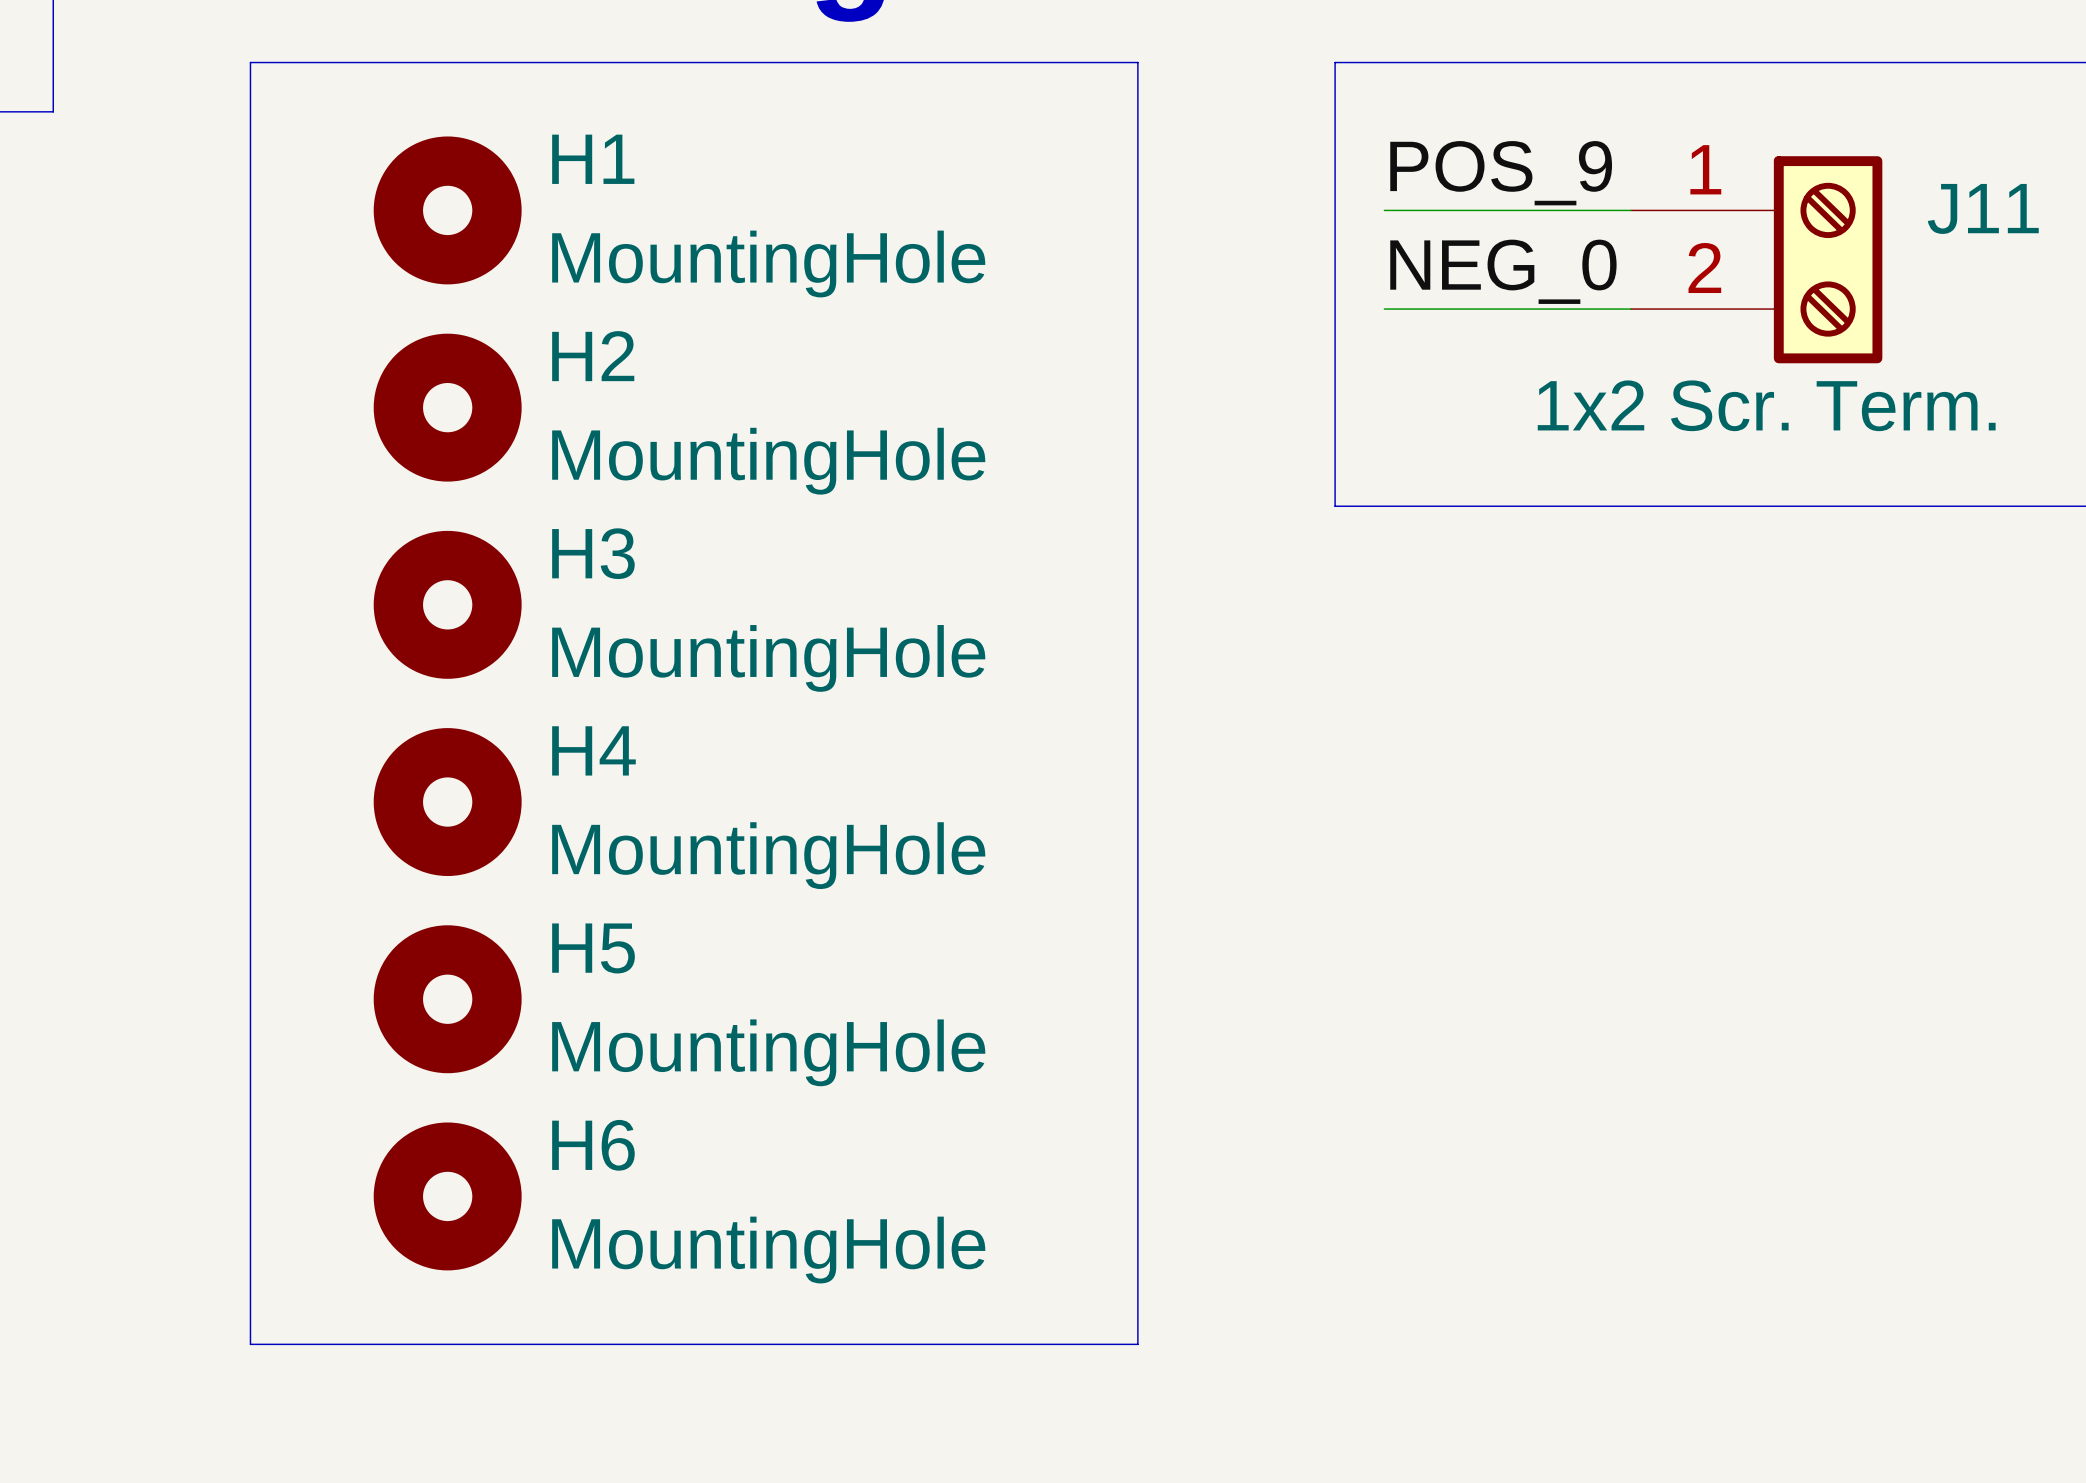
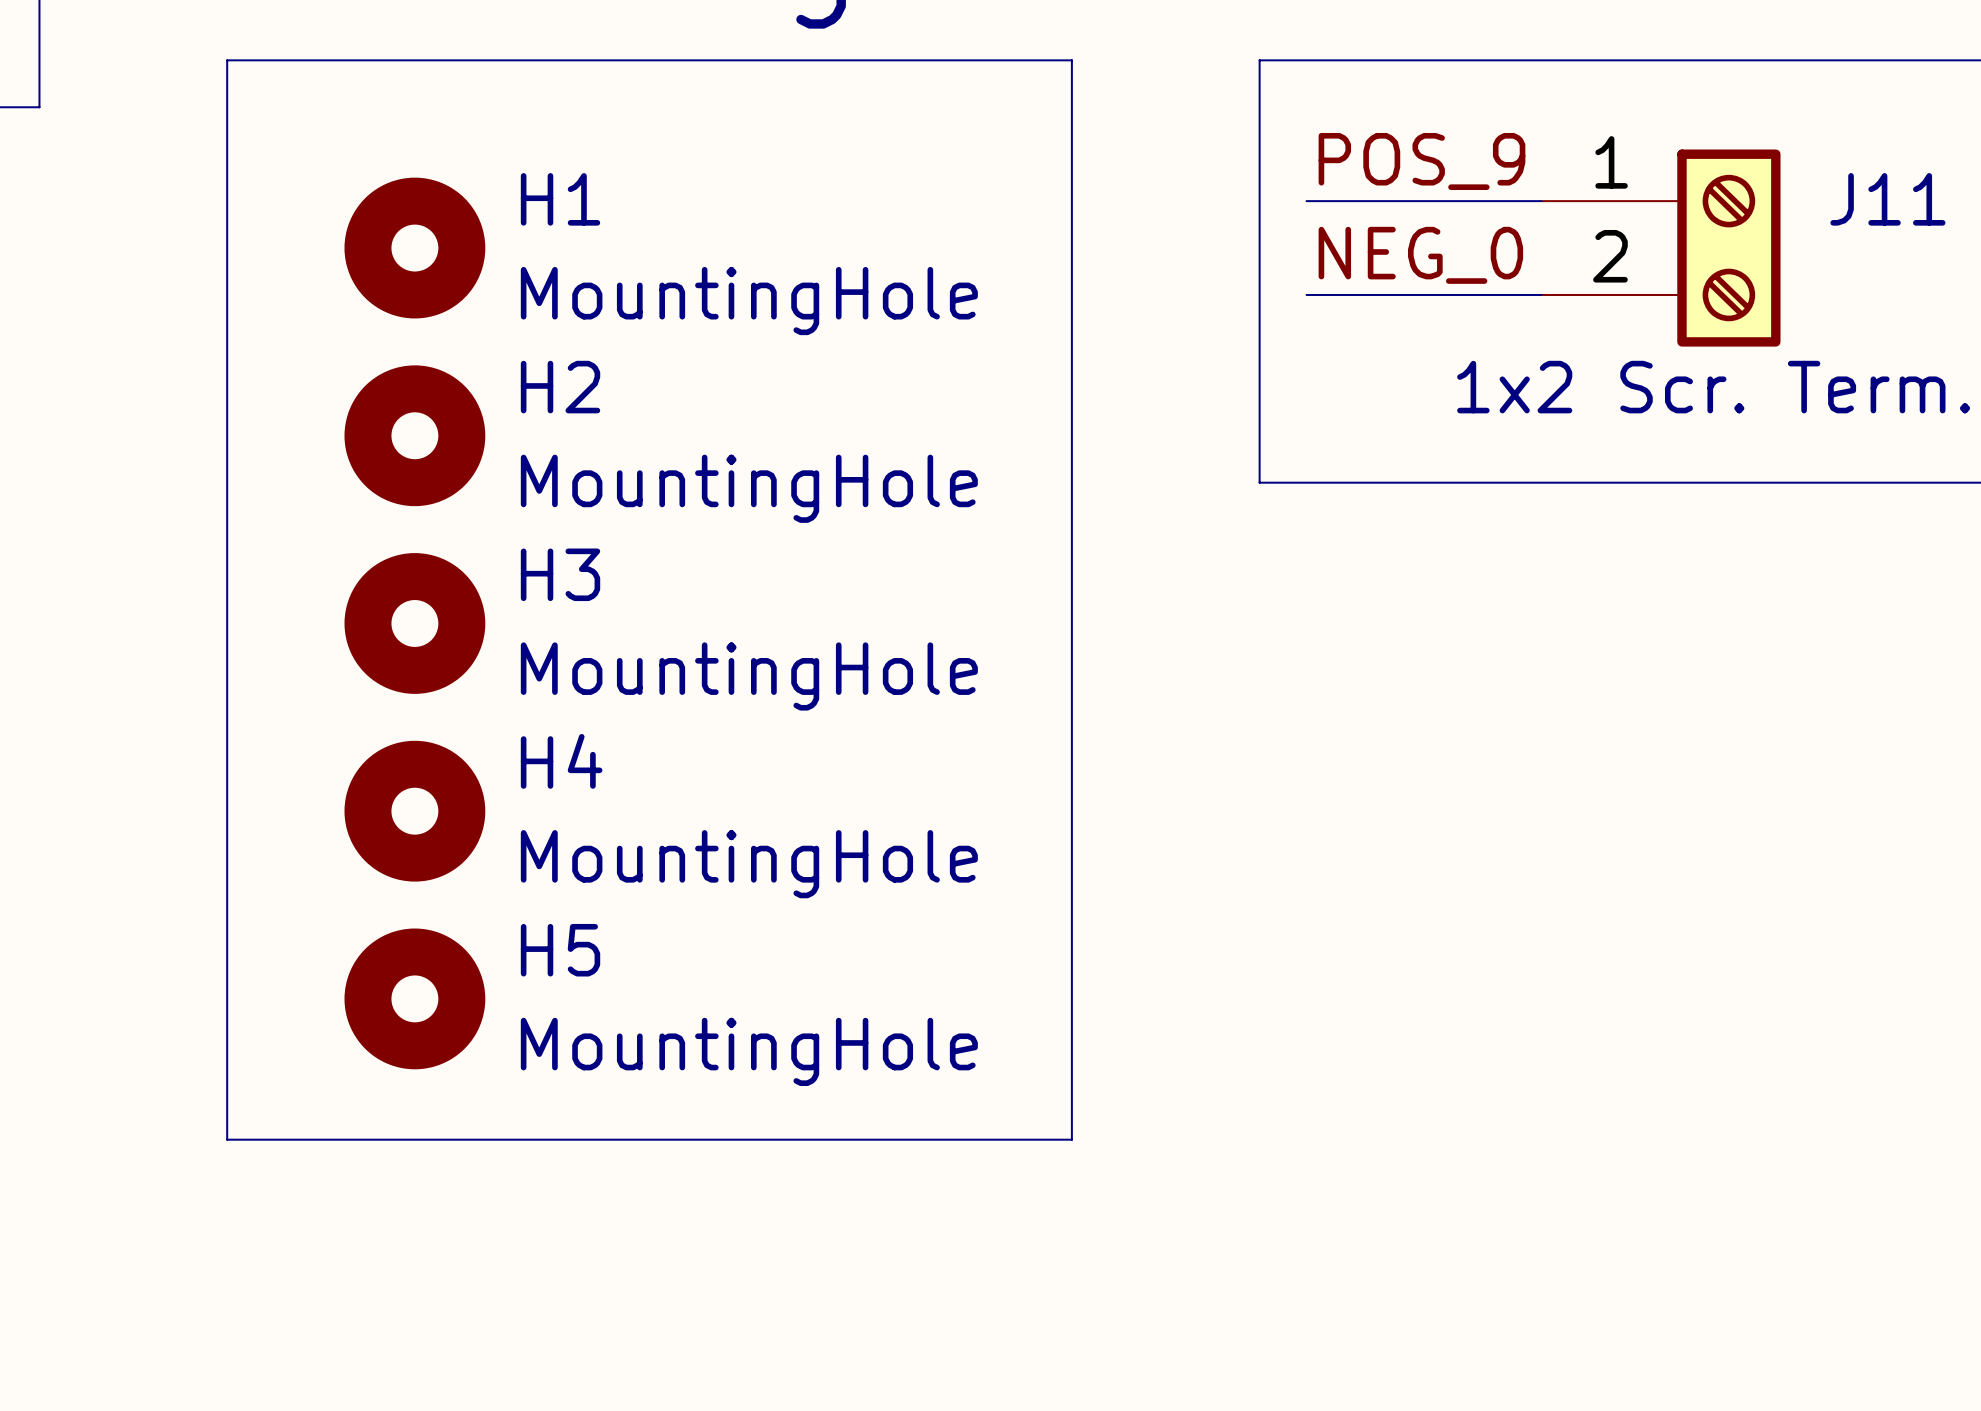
H1 position: (447, 210) -> (414, 248)
H2 position: (447, 407) -> (414, 435)
H3 position: (447, 604) -> (414, 623)
H4 position: (447, 802) -> (414, 811)
H5 position: (447, 999) -> (414, 998)
line: (250, 1196) (250, 1344) (1137, 1344) (1137, 1196) -> (227, 1139) (1071, 1139)
H6: MountingHole (447, 1196) -> none

